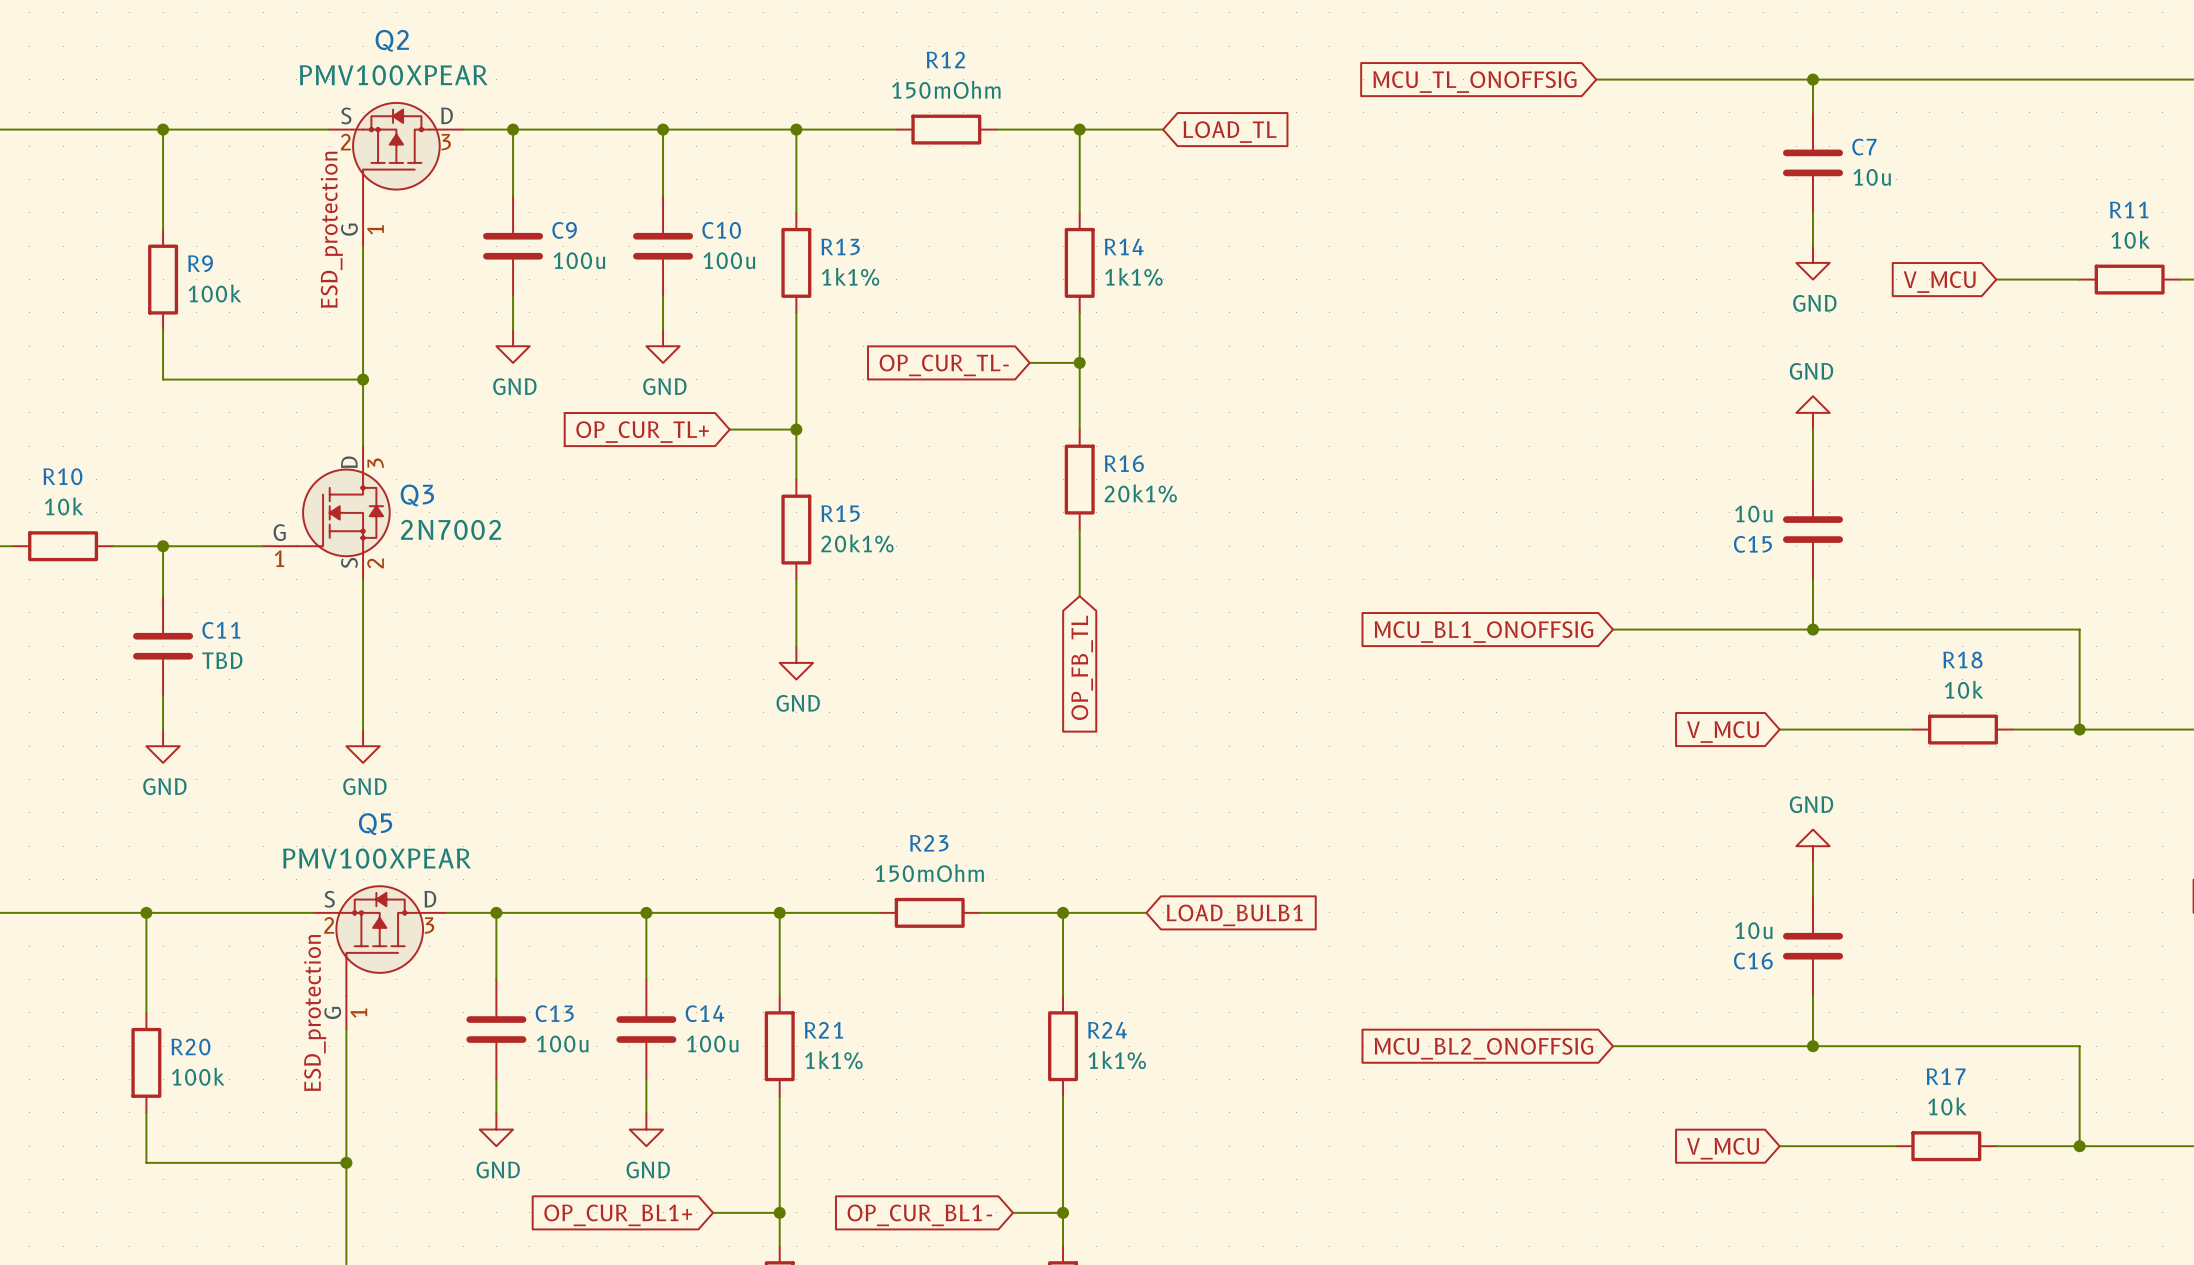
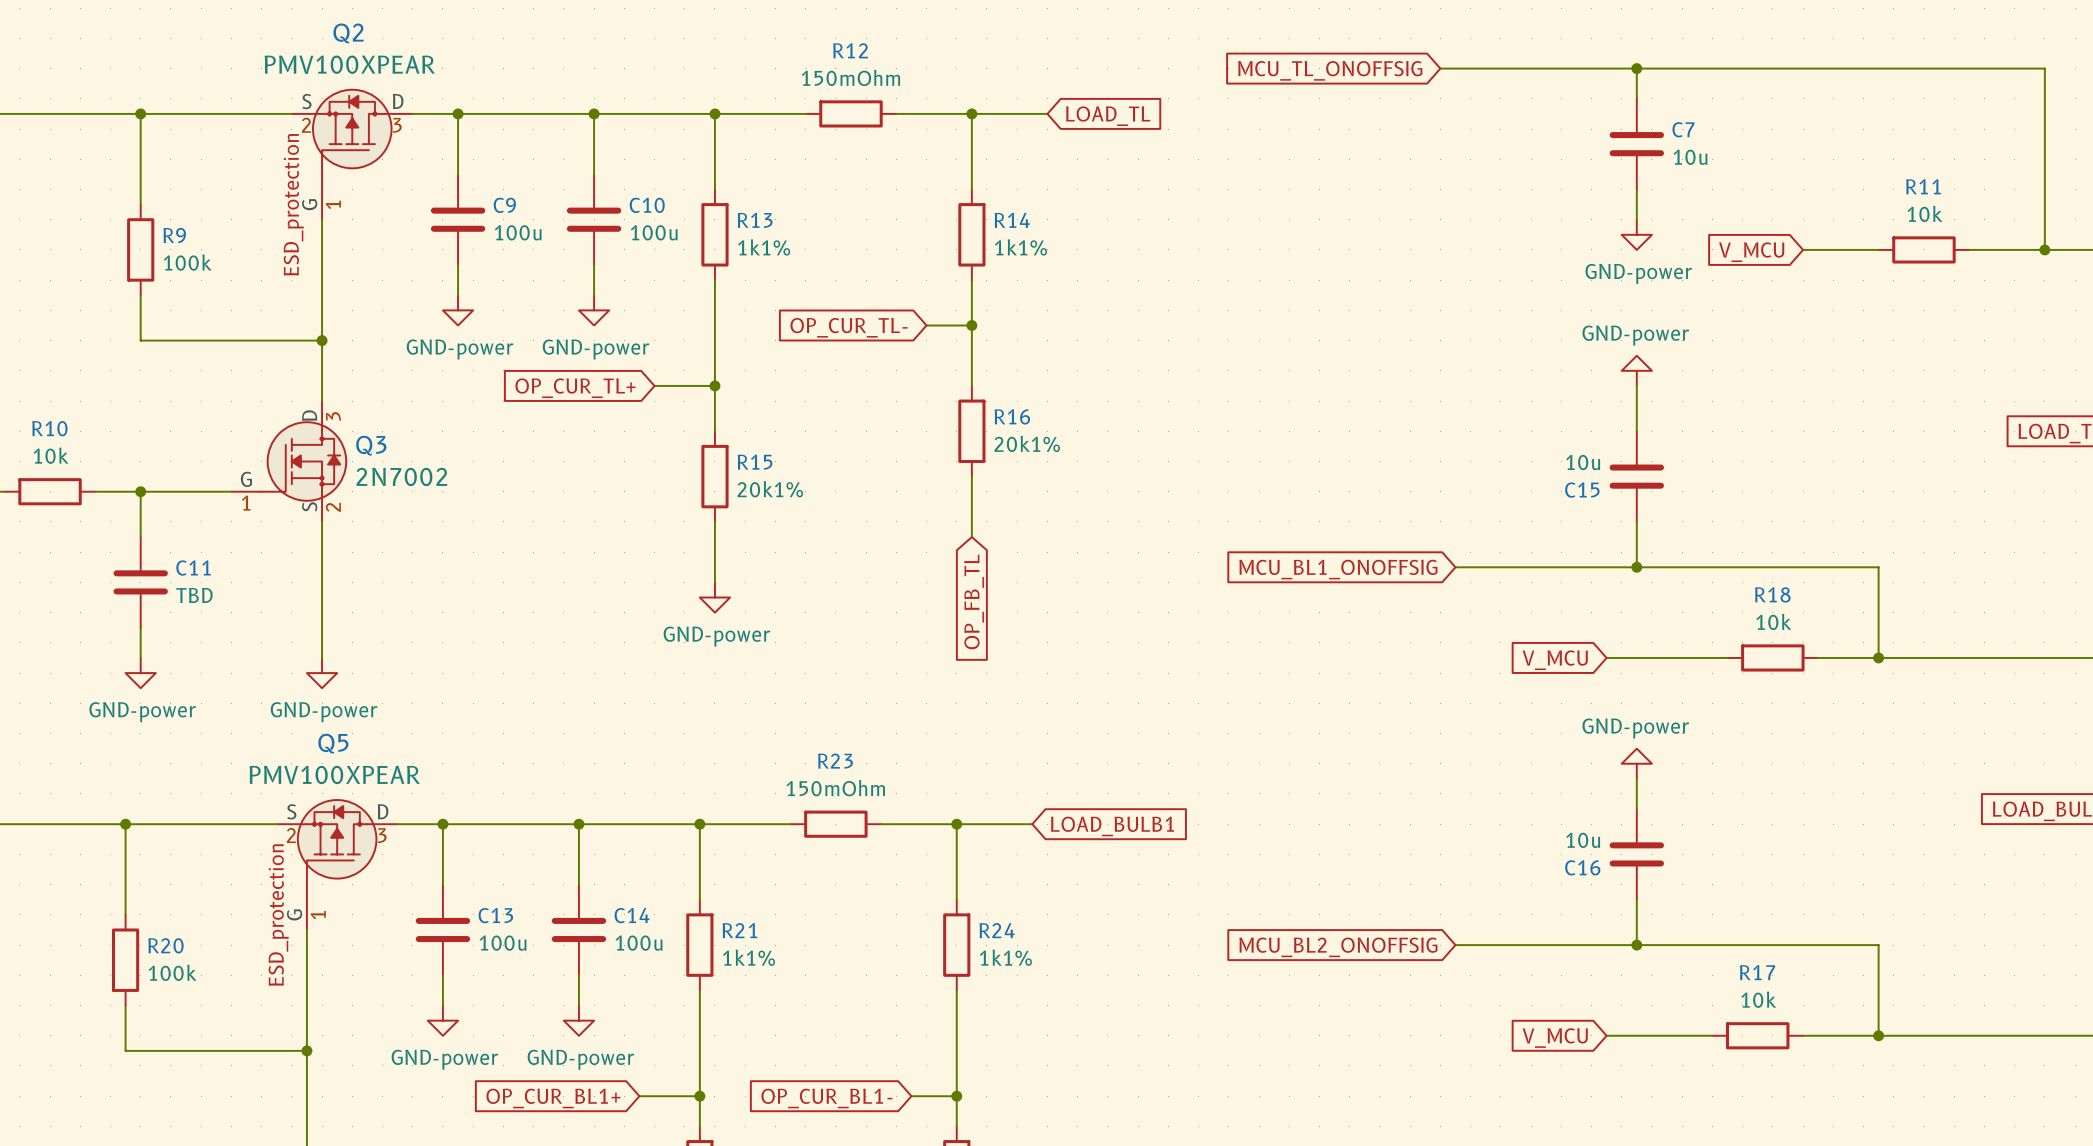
power symbol: GND (1813, 262) -> GND-power (1636, 234)
power symbol: GND (513, 346) -> GND-power (458, 310)
power symbol: GND (663, 346) -> GND-power (594, 310)
power symbol: GND (1813, 412) -> GND-power (1636, 370)
power symbol: GND (796, 662) -> GND-power (714, 597)
power symbol: GND (163, 746) -> GND-power (140, 673)
power symbol: GND (363, 746) -> GND-power (322, 673)
power symbol: GND (1813, 846) -> GND-power (1636, 763)
power symbol: GND (496, 1129) -> GND-power (442, 1020)
power symbol: GND (646, 1129) -> GND-power (578, 1020)

